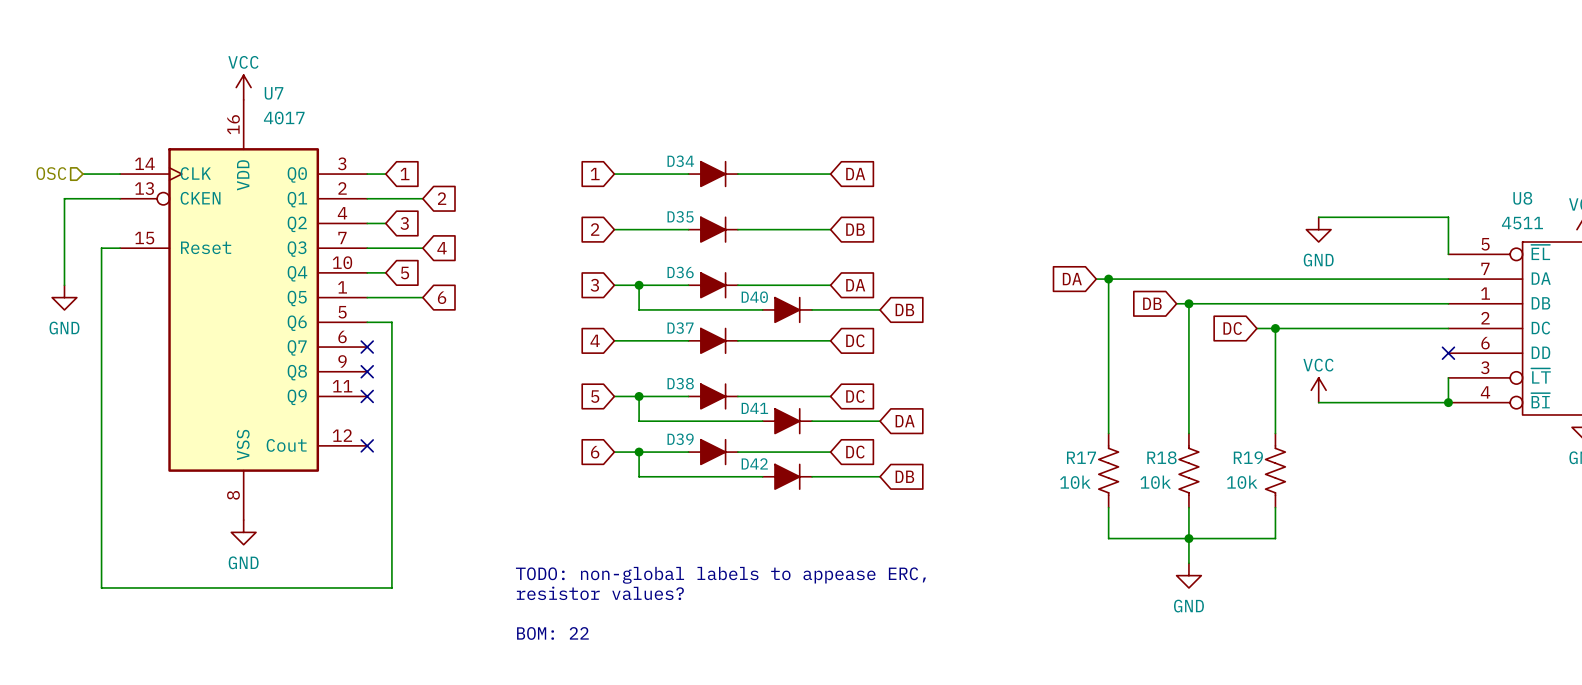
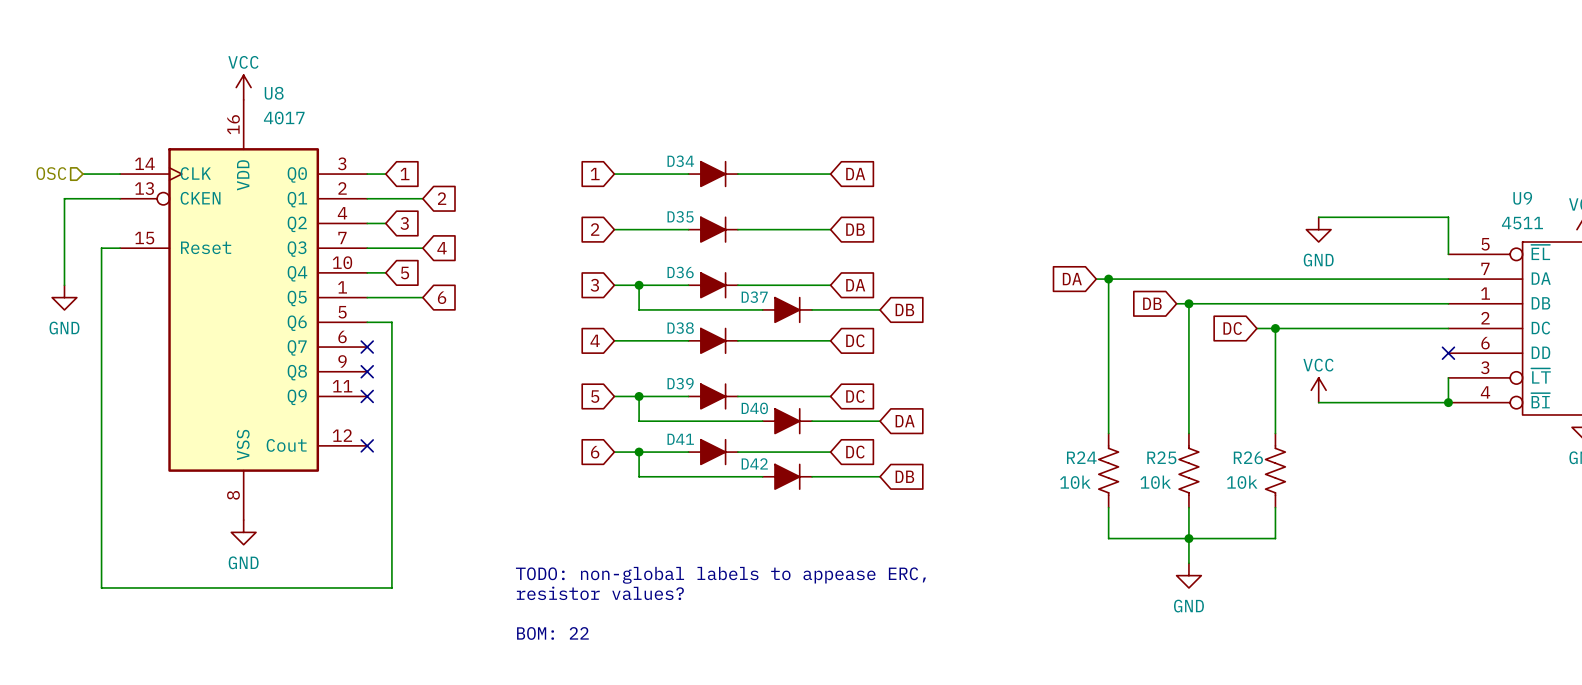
U7 name: U7 (274, 93) -> U8 (274, 93)
U8 name: U8 (1522, 198) -> U9 (1522, 198)
D40 name: D40 (754, 297) -> D37 (754, 297)
D37 name: D37 (680, 328) -> D38 (680, 328)
D38 name: D38 (680, 383) -> D39 (680, 383)
D41 name: D41 (754, 408) -> D40 (754, 408)
D39 name: D39 (680, 439) -> D41 (680, 439)
R17 name: R17 (1081, 457) -> R24 (1081, 457)
R18 name: R18 (1161, 457) -> R25 (1161, 457)
R19 name: R19 (1248, 457) -> R26 (1248, 457)

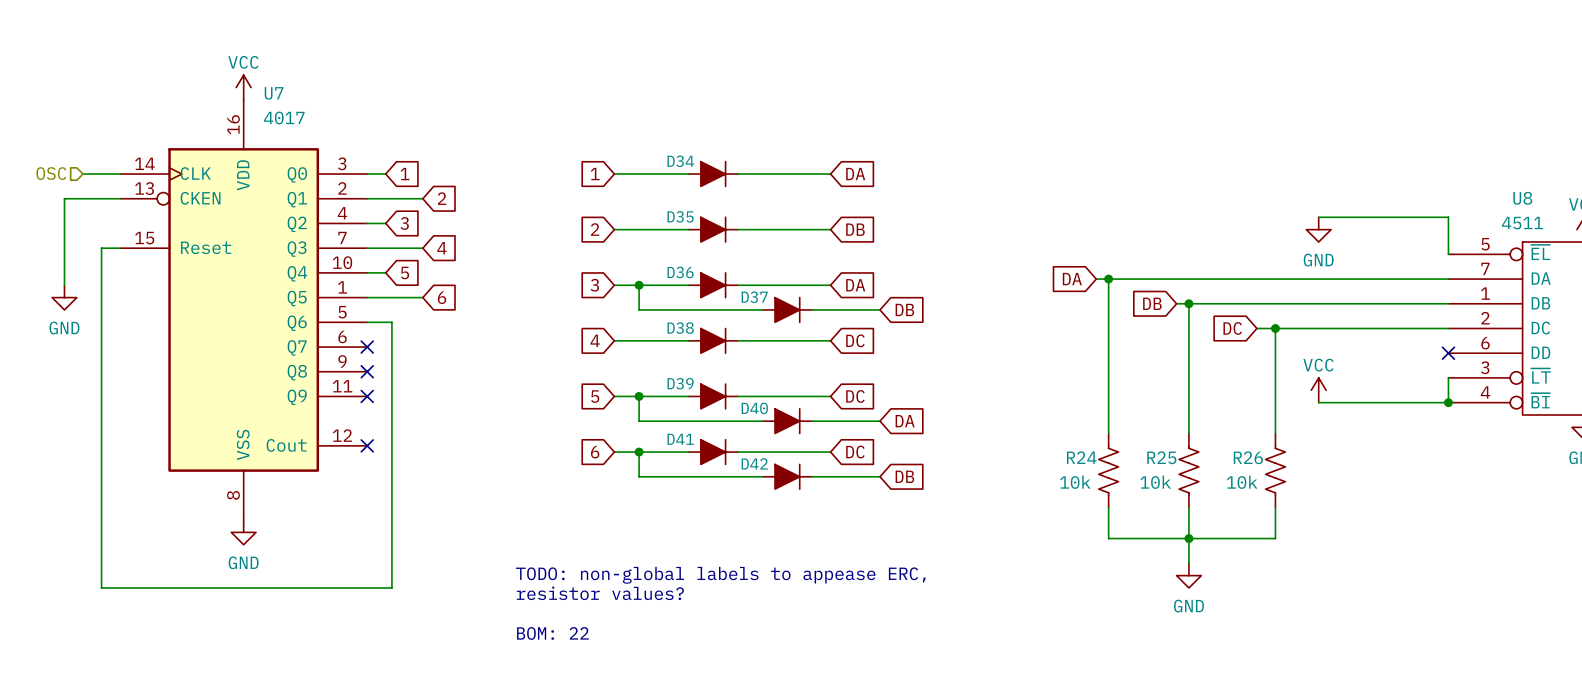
U8 name: U8 (274, 93) -> U7 (274, 93)
U9 name: U9 (1522, 198) -> U8 (1522, 198)

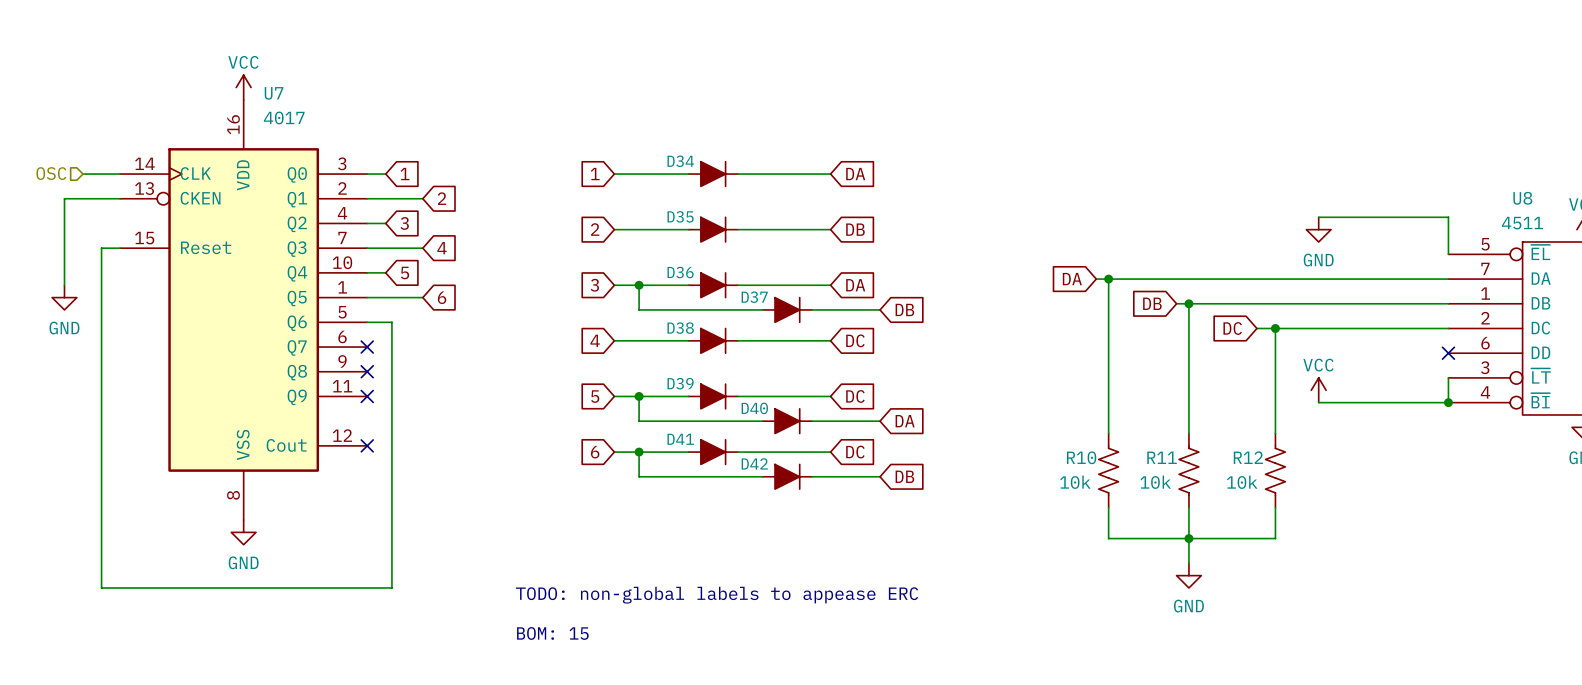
R24 name: R24 (1081, 457) -> R10 (1081, 457)
R25 name: R25 (1161, 457) -> R11 (1162, 457)
R26 name: R26 (1248, 457) -> R12 (1248, 457)
text: TODO: non-global labels to appease ERC, (720, 575) -> none
text: resistor values? (600, 593) -> TODO: non-global labels to appease ERC (717, 595)
text: BOM: 22 (552, 633) -> BOM: 15 (552, 633)

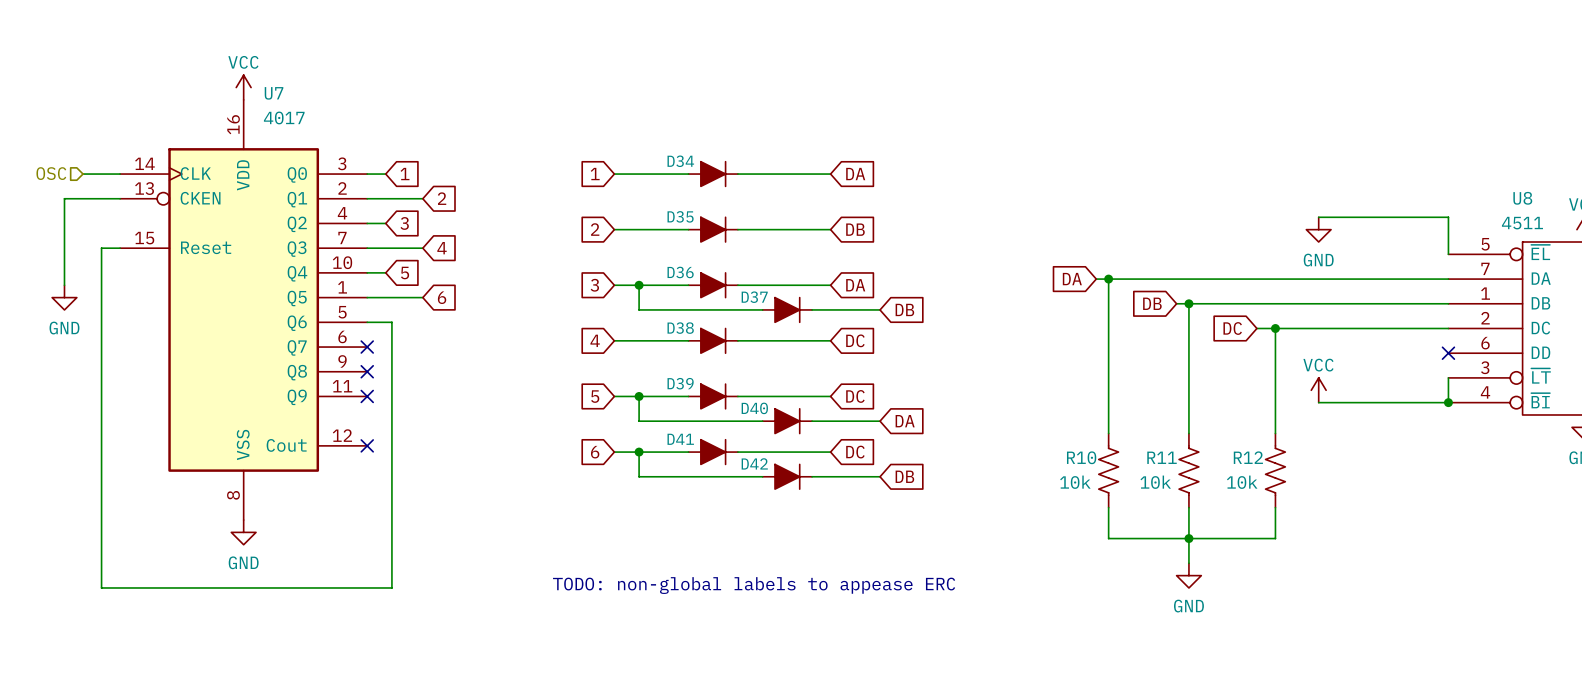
text position: TODO: non-global labels to appease ERC (717, 595) -> TODO: non-global labels to appease ERC (754, 585)
text: BOM: 15 (552, 633) -> none

